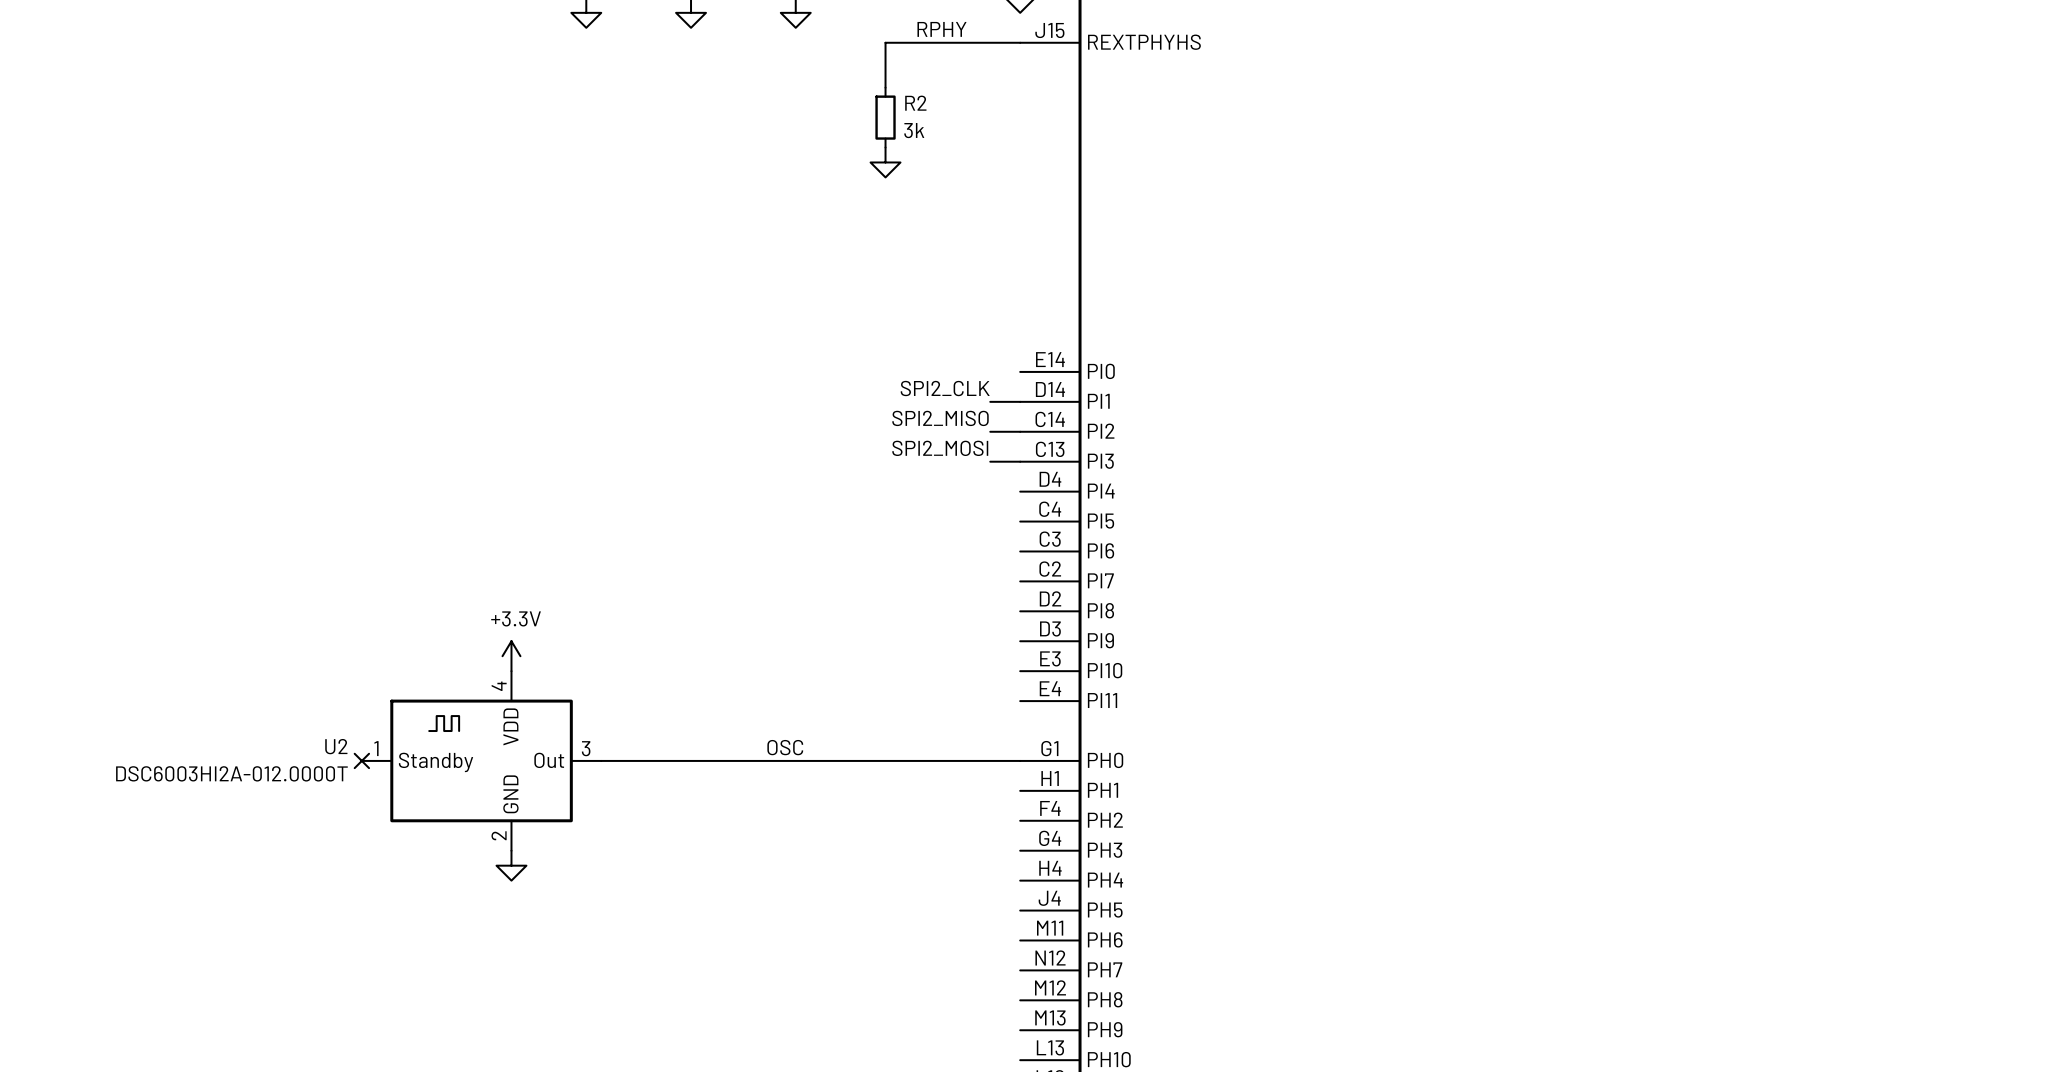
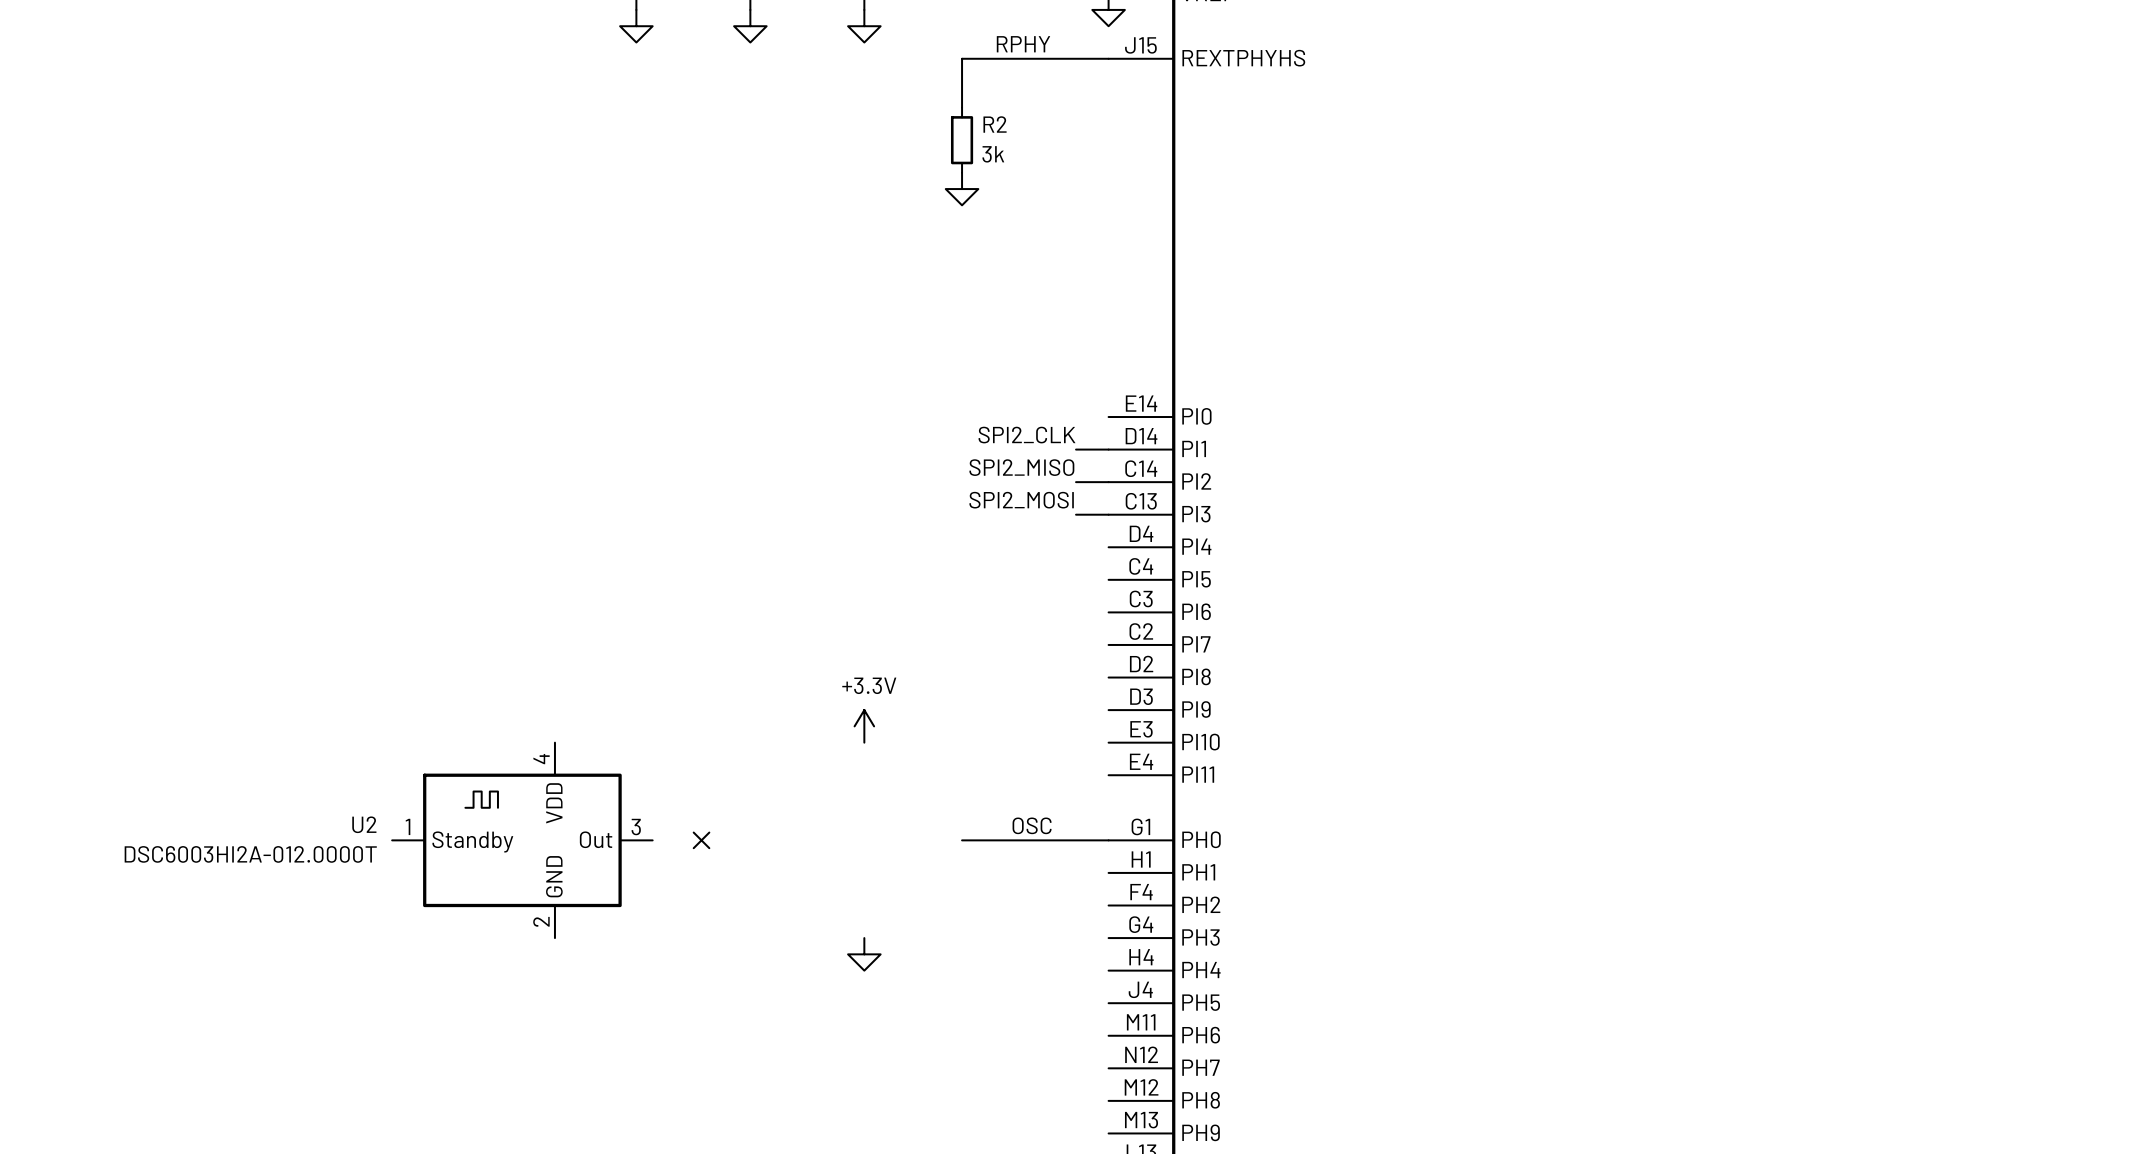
power symbol position: +3.3V (511, 656) -> +3.3V (864, 726)
label position: OSC (785, 747) -> OSC (1032, 825)
no-connect mark: (361, 760) -> none
wire: (601, 760) (885, 760) -> none
no-connect mark: none -> (701, 840)
power symbol position: (511, 865) -> (864, 954)

